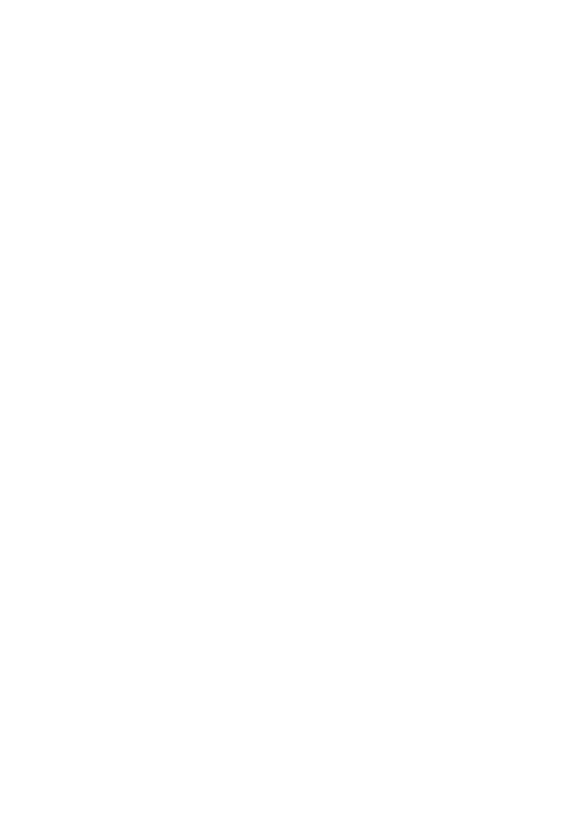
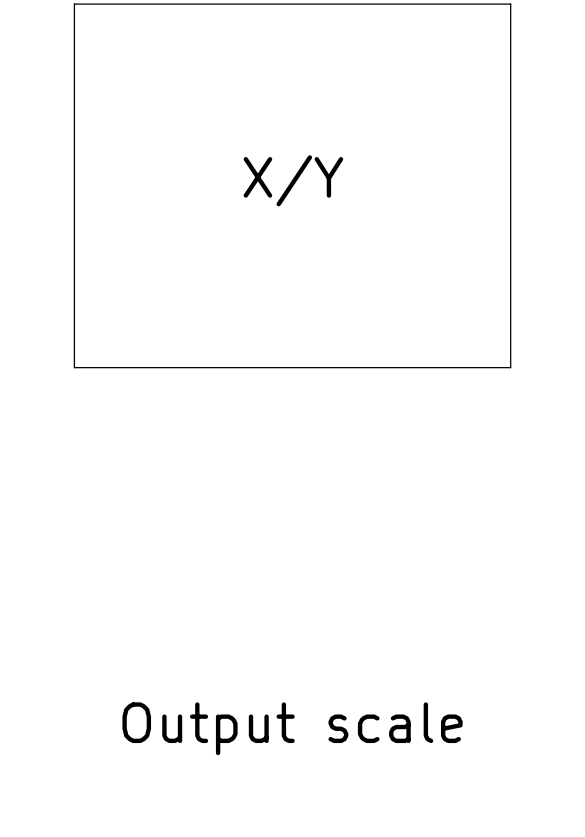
line: none -> (74, 4) (510, 4) (510, 367) (74, 367) (74, 4)
text: none -> X/Y (293, 180)
text: none -> Output scale (292, 728)

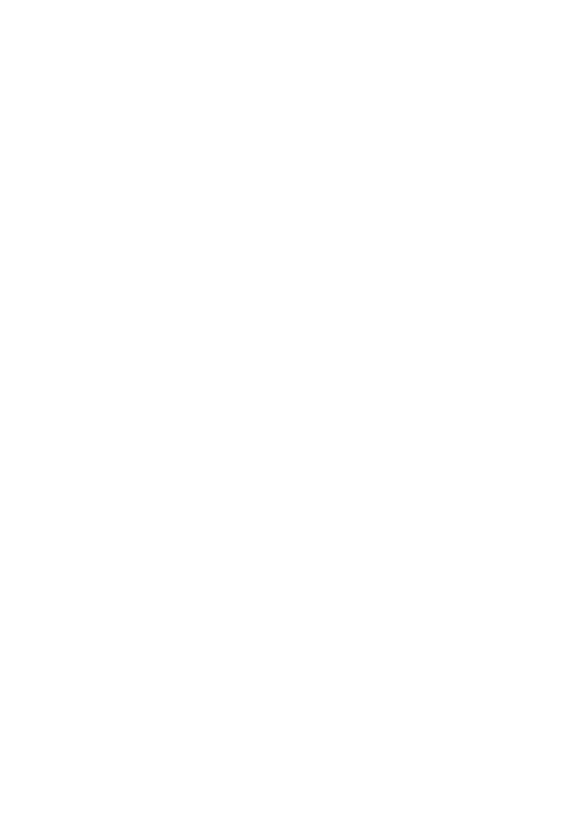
line: (74, 4) (510, 4) (510, 367) (74, 367) (74, 4) -> none
text: X/Y (293, 180) -> none
text: Output scale (292, 728) -> none

